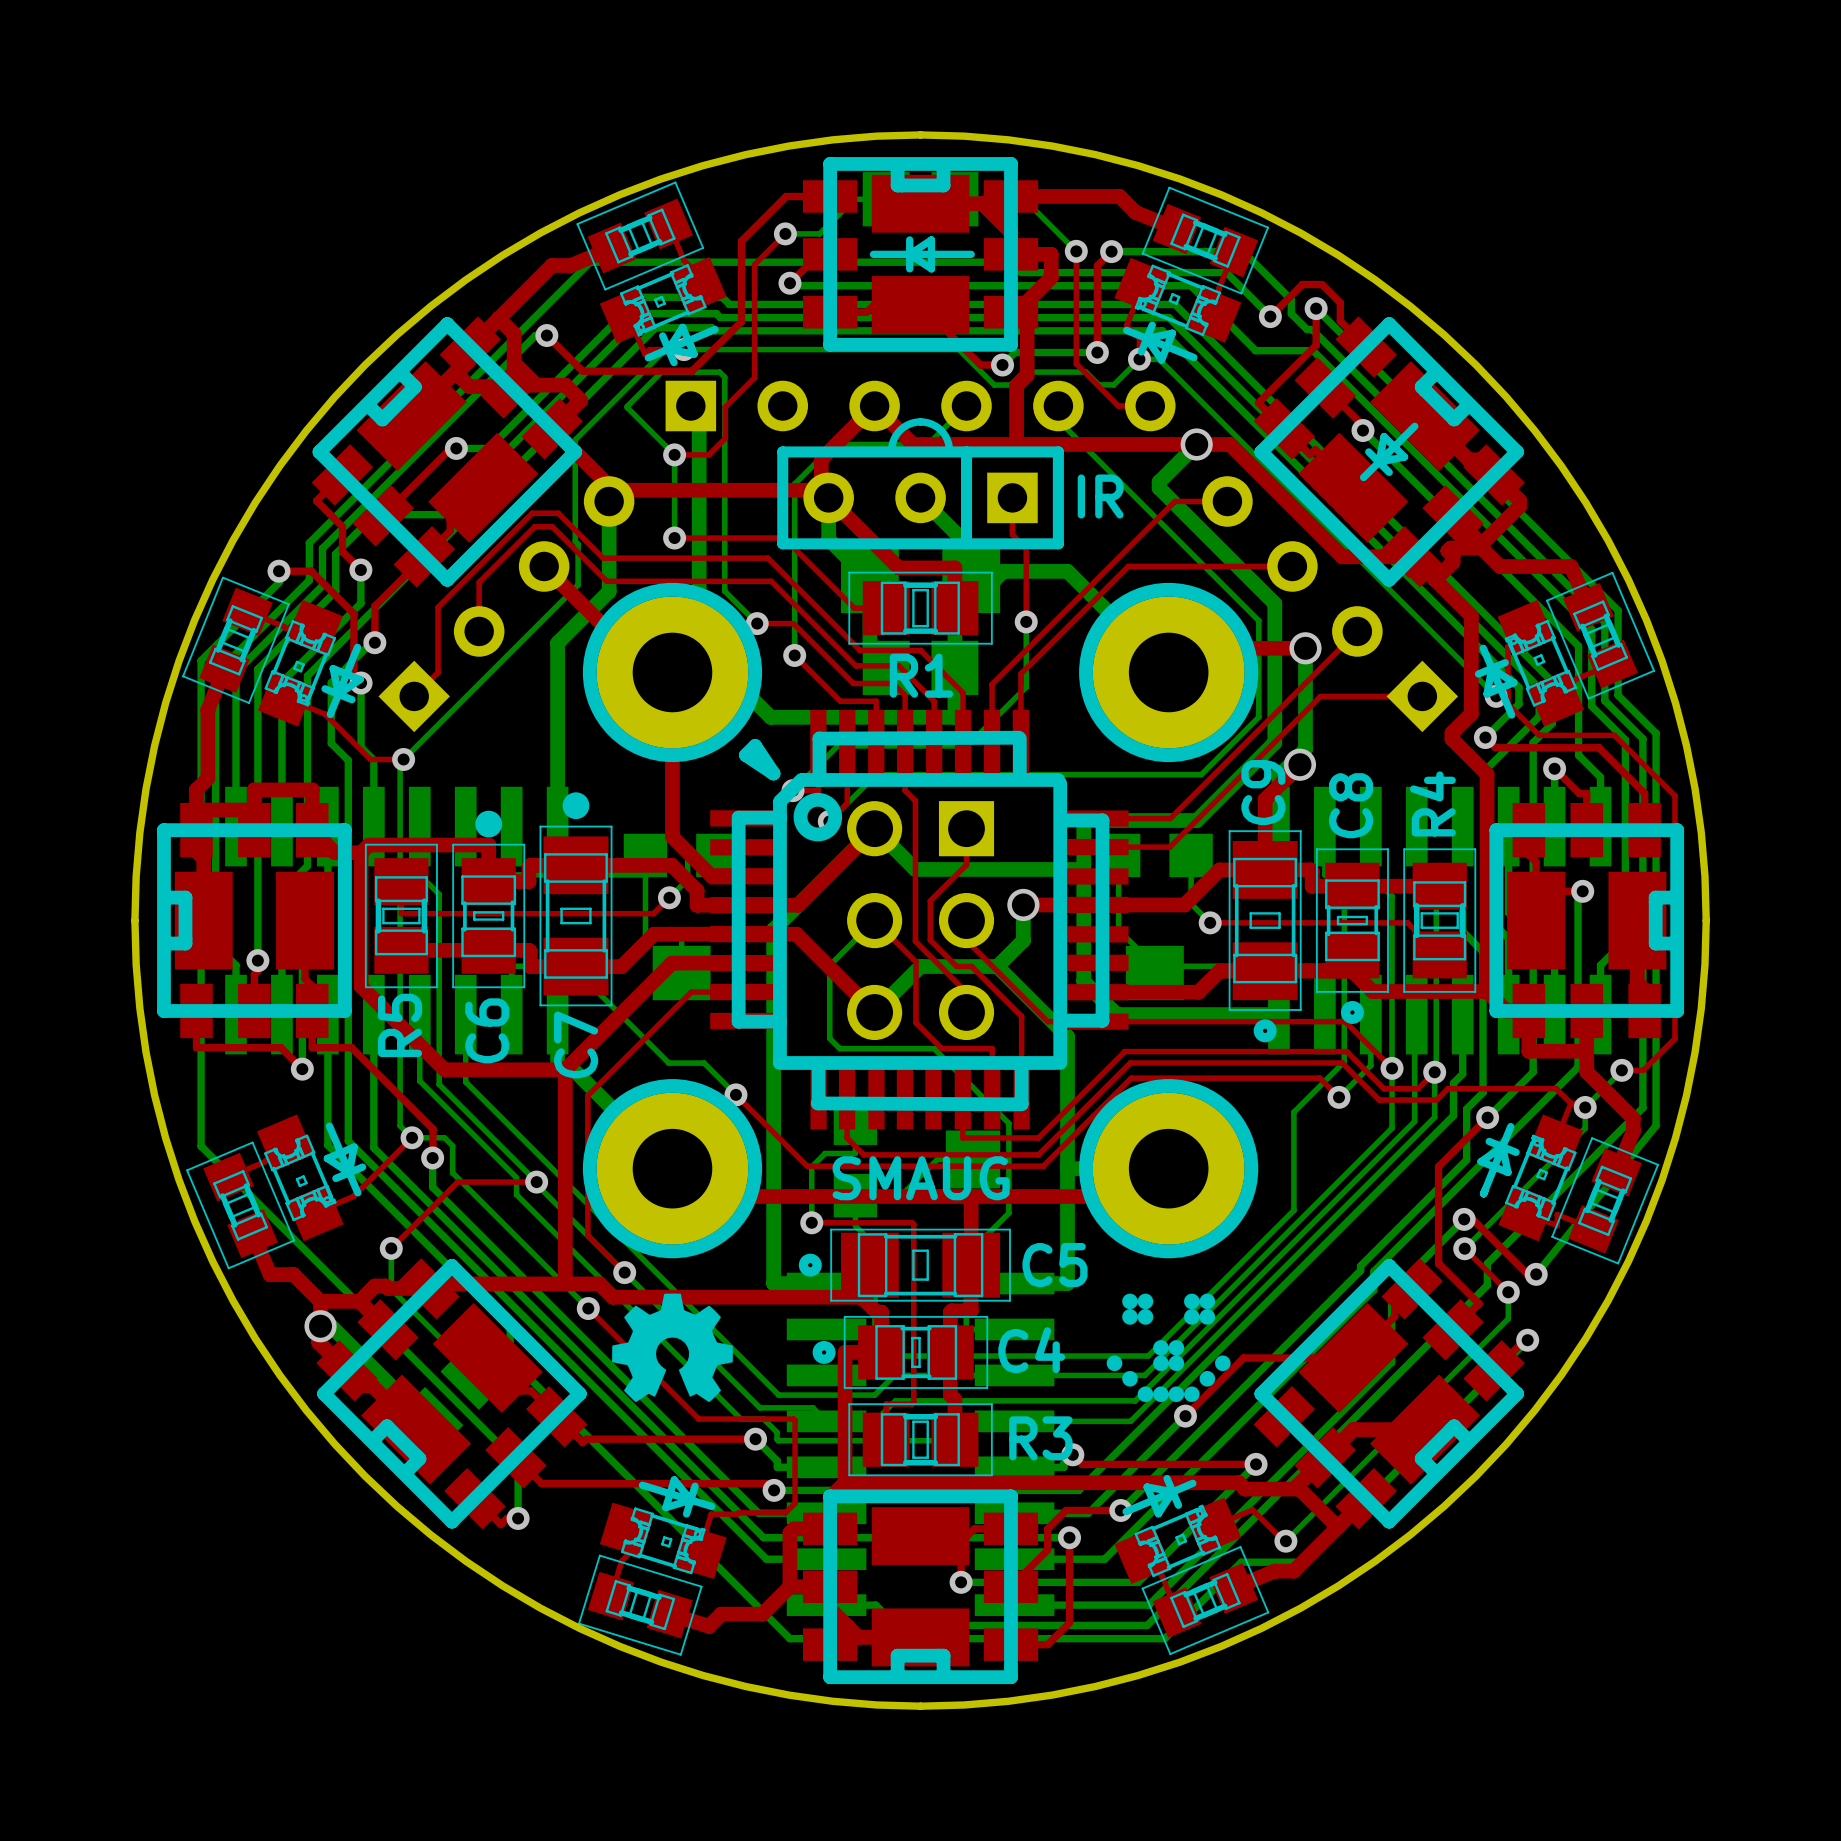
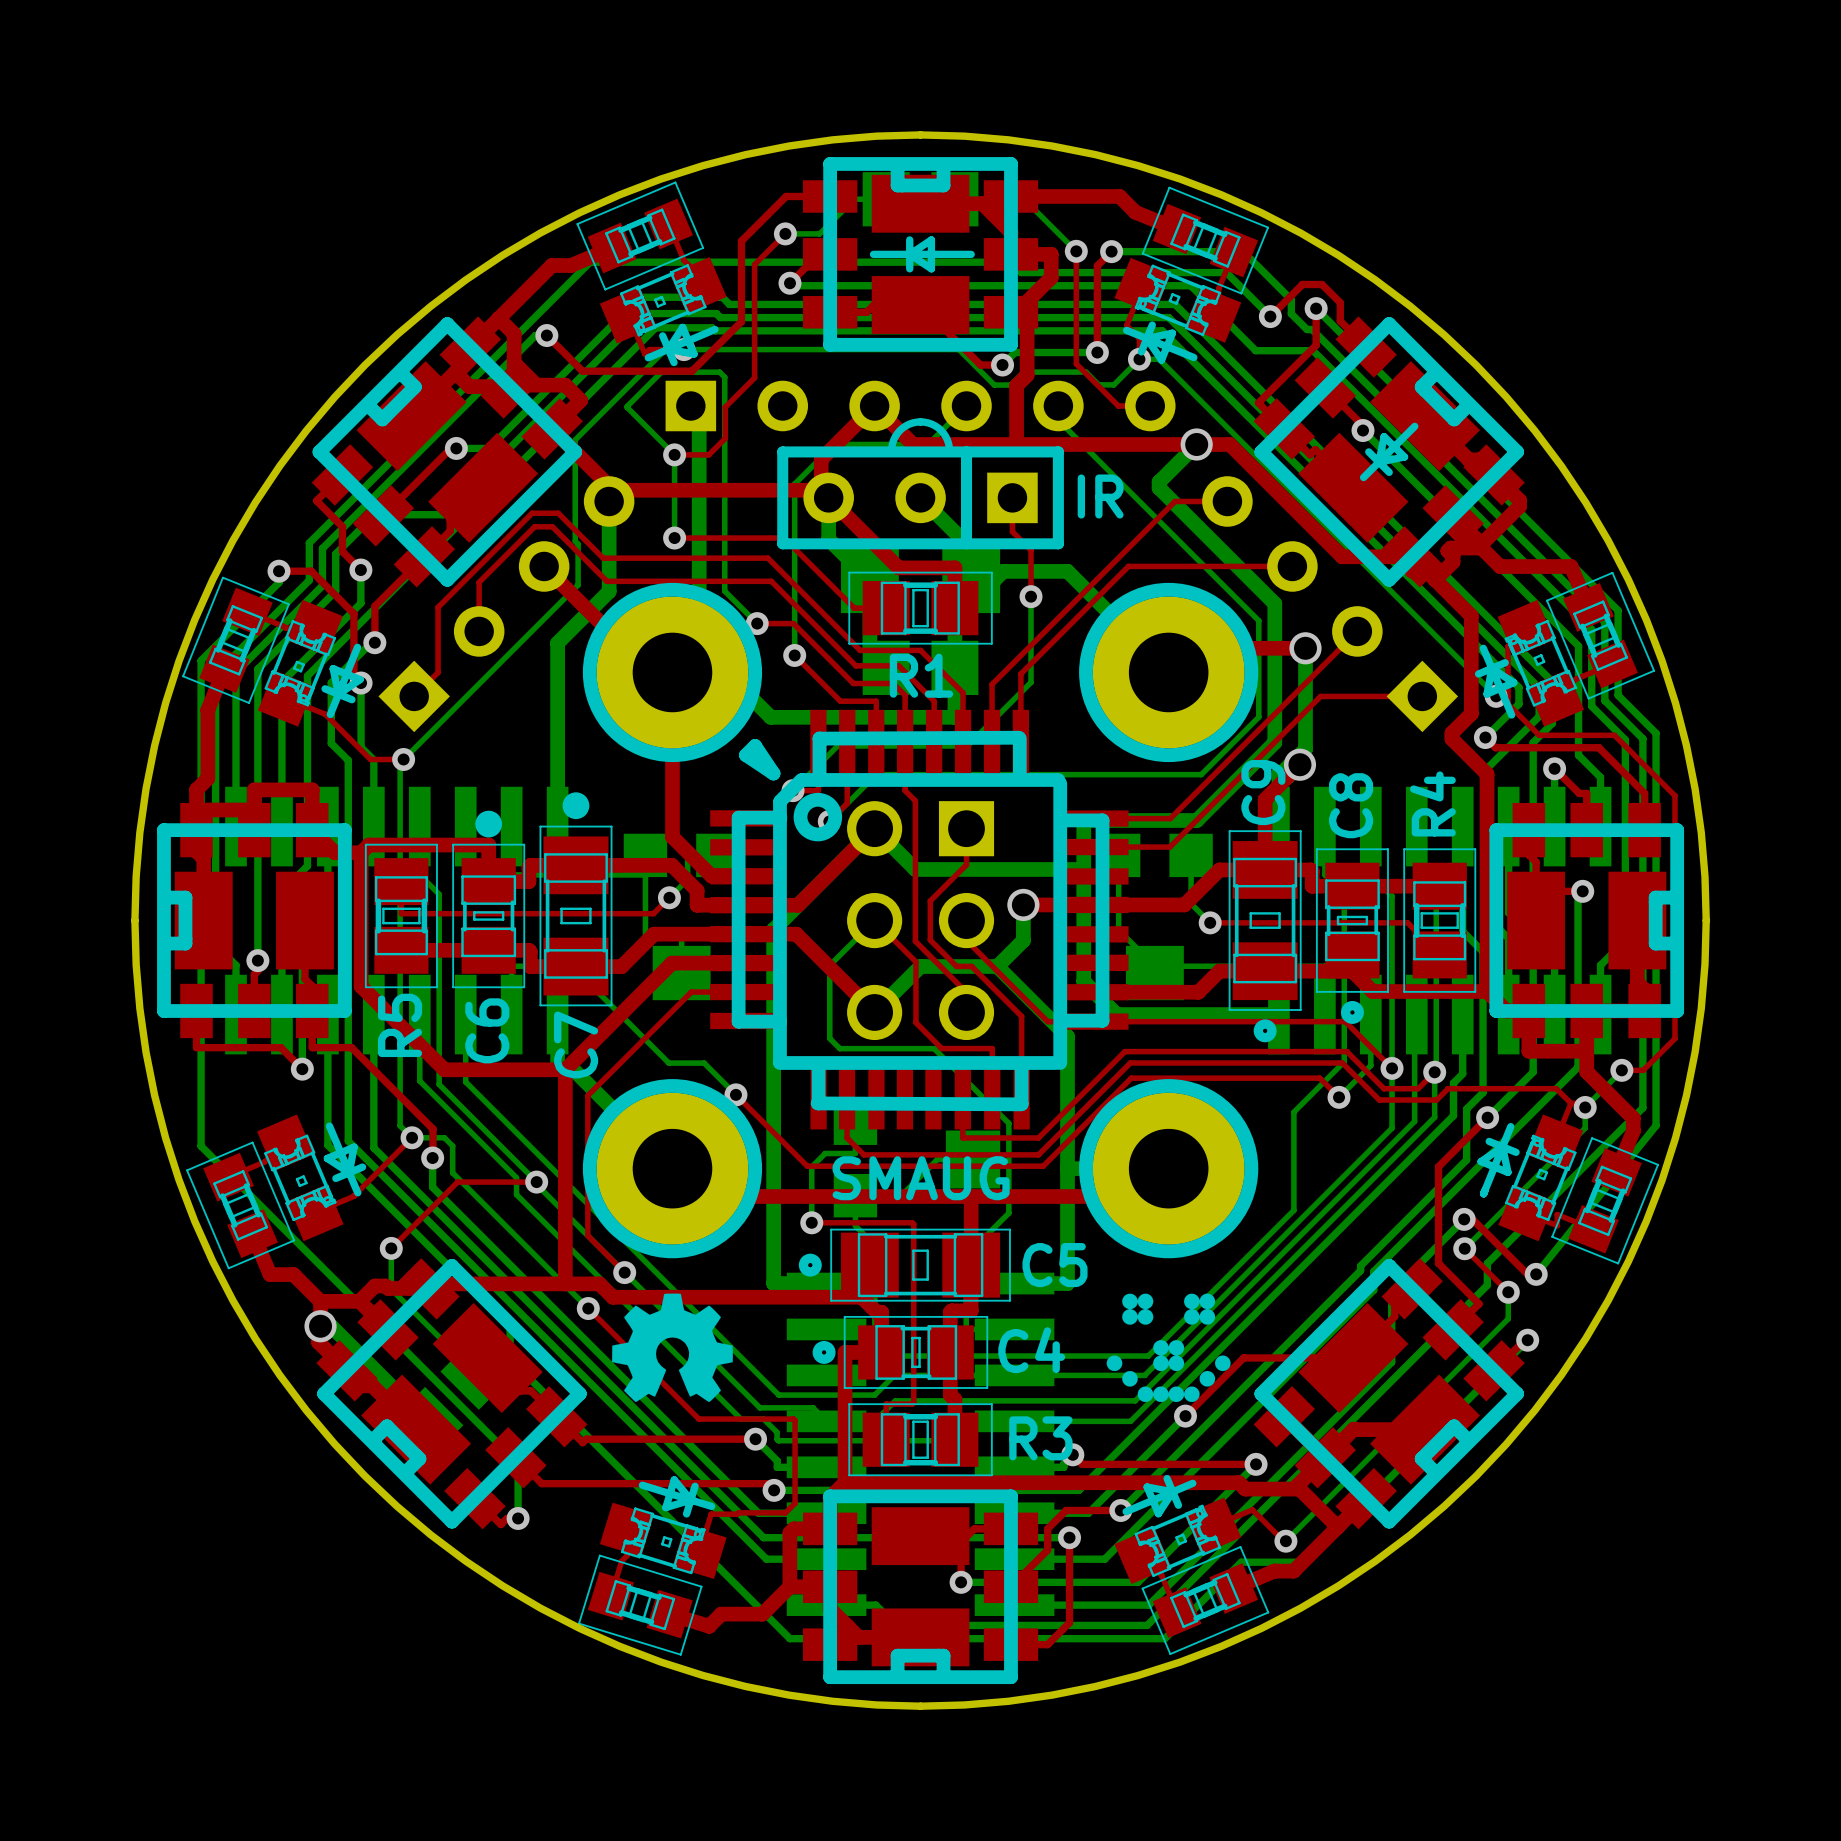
top track: (1012, 531) (1012, 534) (1026, 548) (1026, 621) -> (1012, 531) (1031, 550) (1031, 596)
bottom track: (1026, 621) (1026, 687) -> (1031, 596) (1031, 682) (1026, 687)
via position: (1026, 621) -> (1031, 596)

